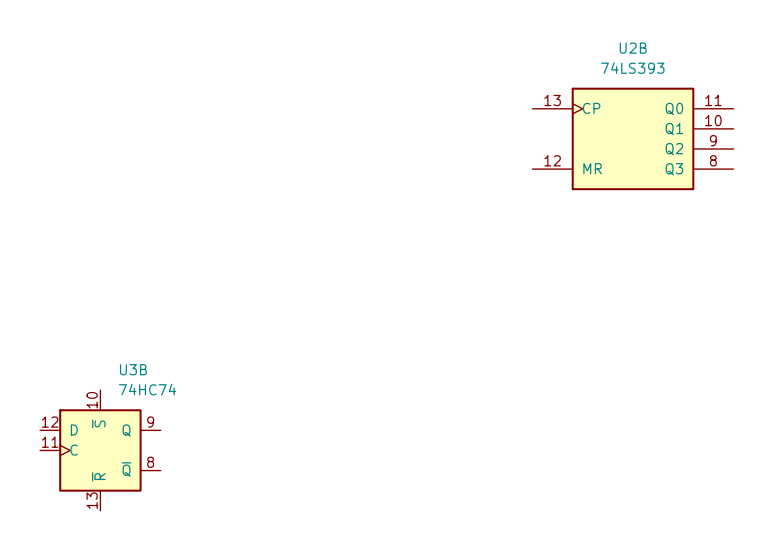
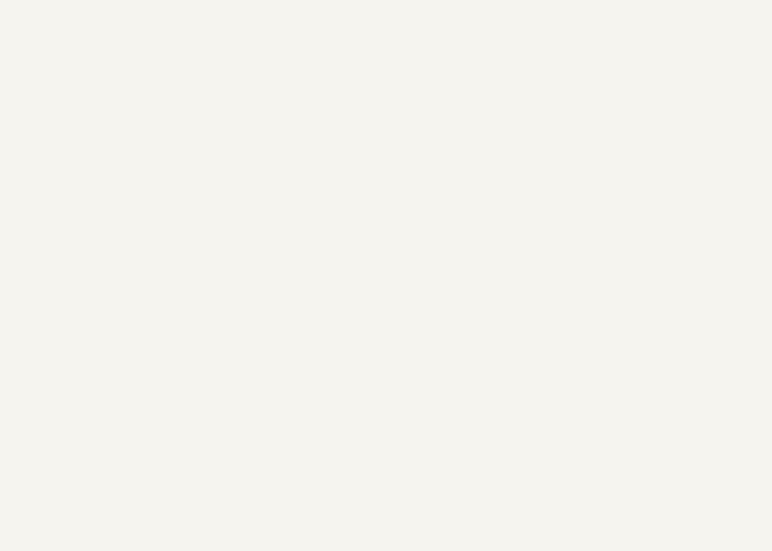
U2B: 74LS393 (633, 138) -> none
U3B: 74HC74 (100, 450) -> none

